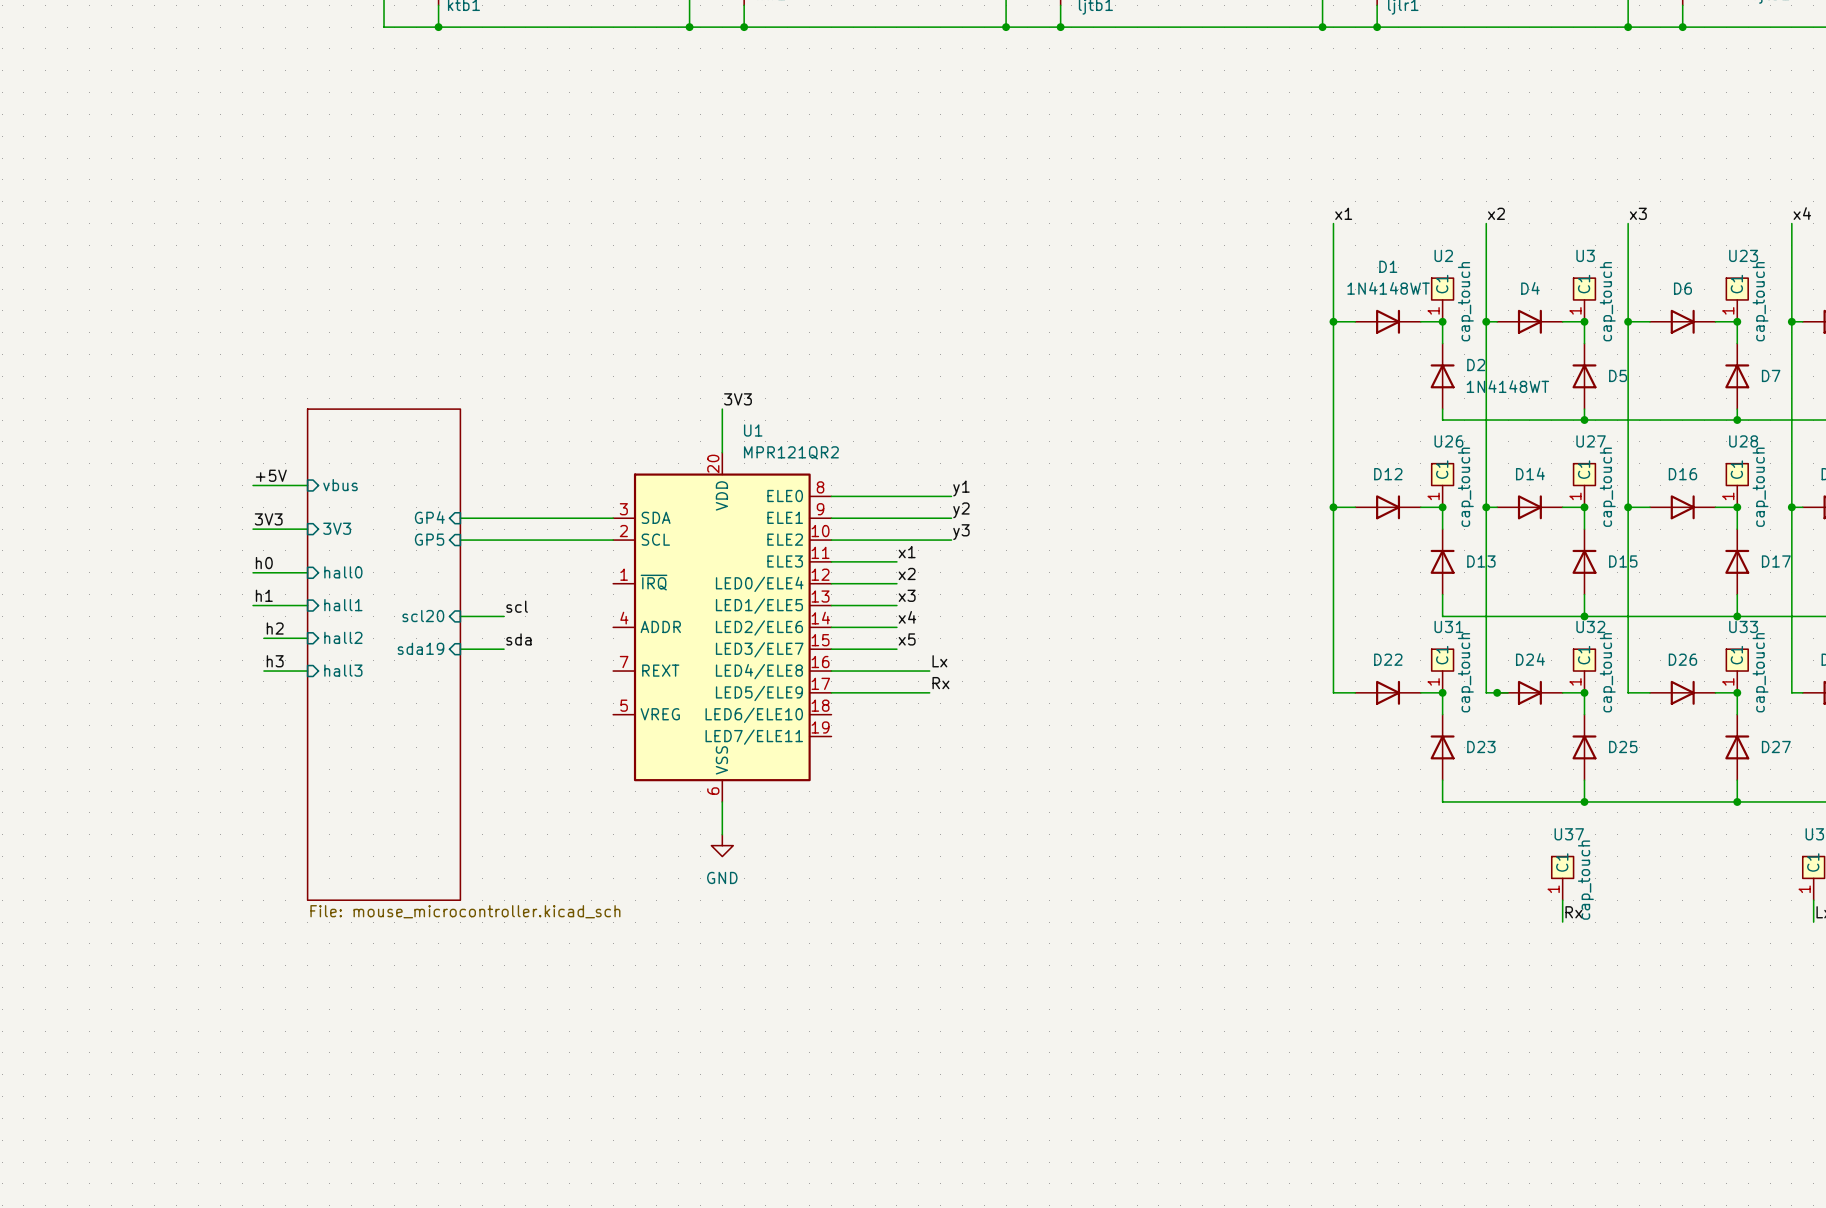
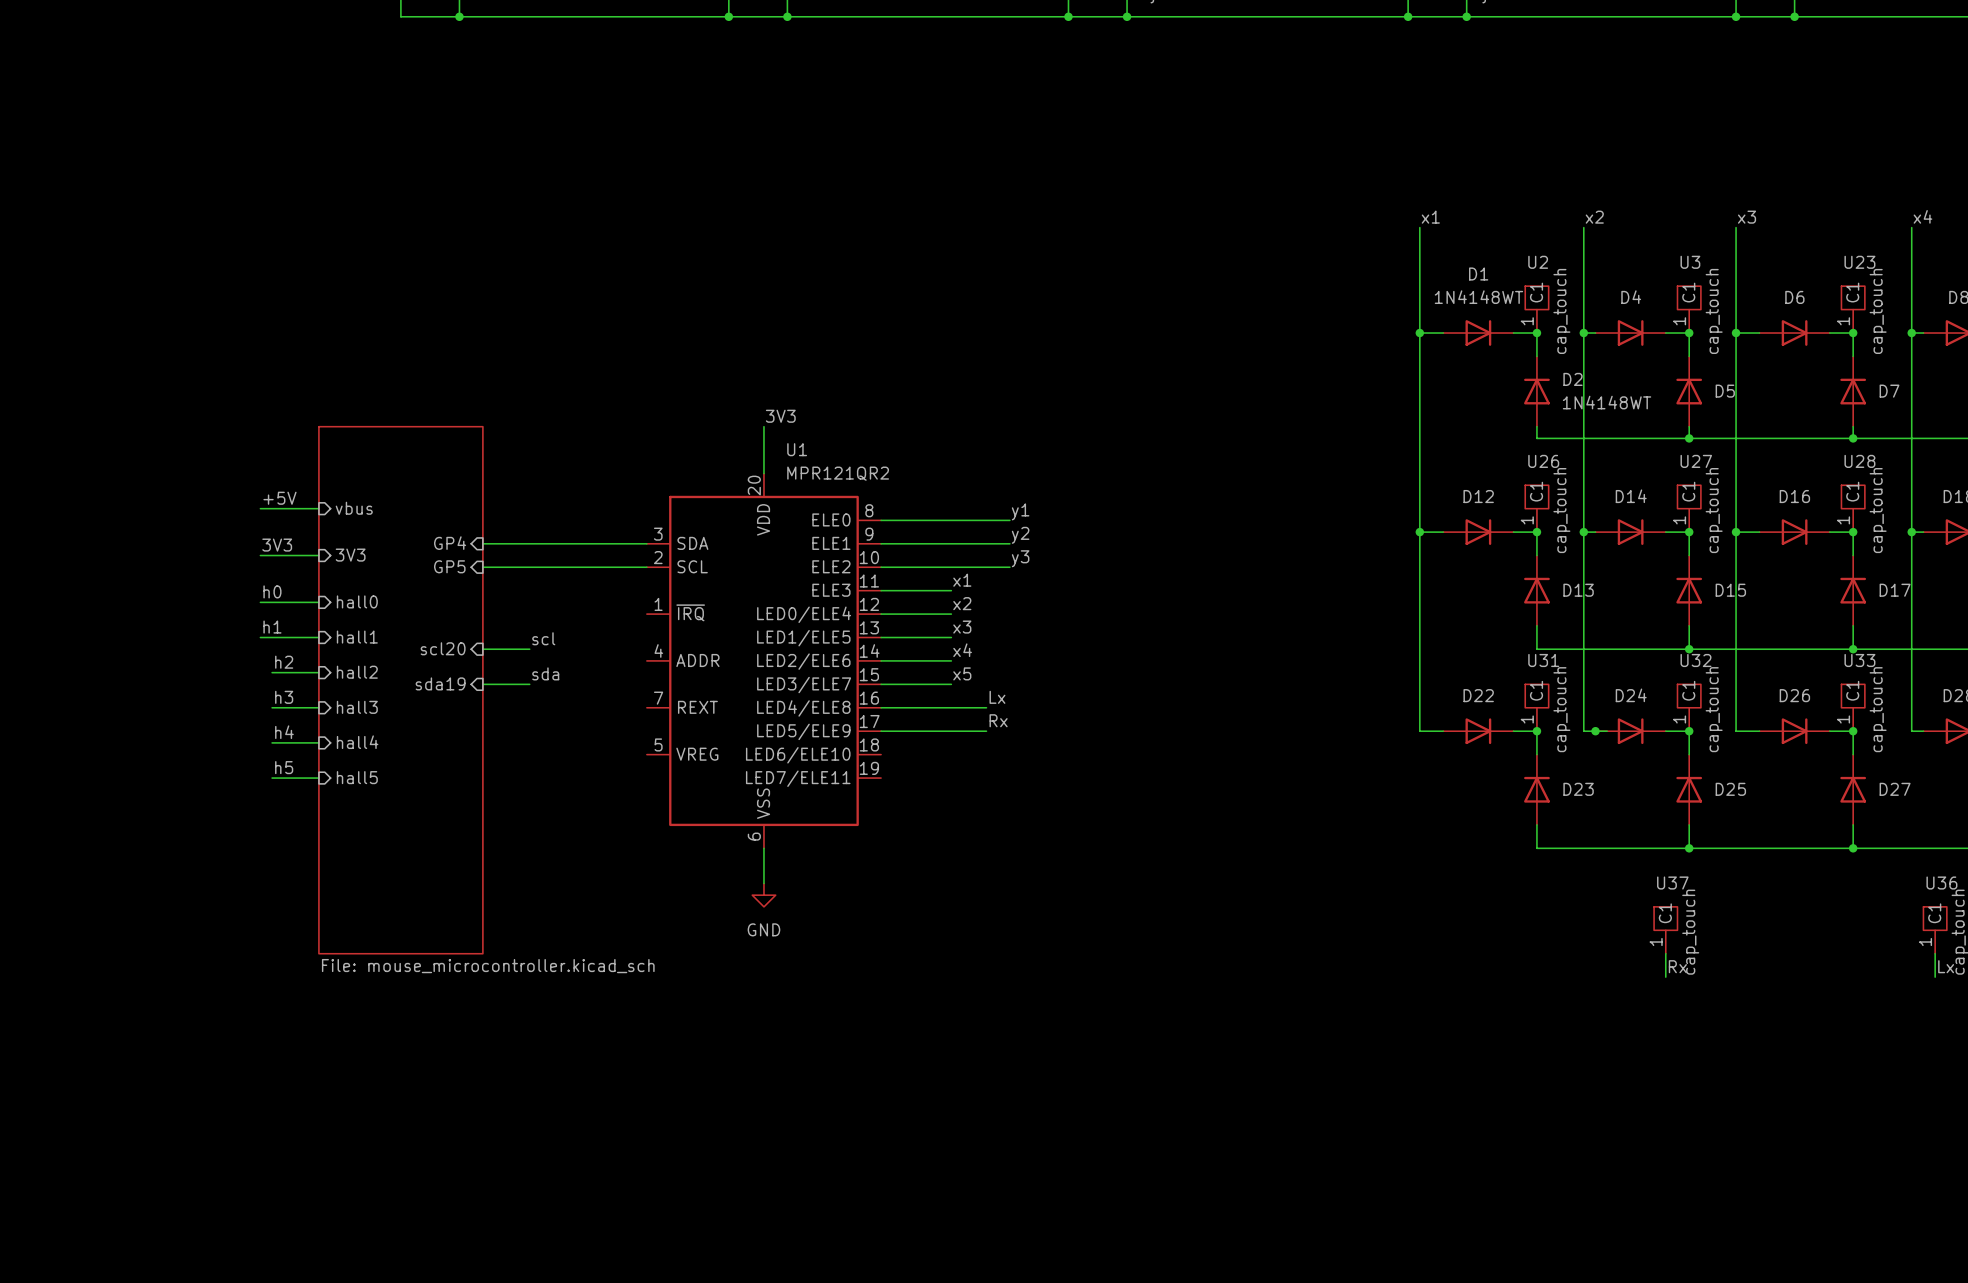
label: none -> h4 (284, 732)
wire: none -> (272, 742) (318, 742)
sheet pin: none -> hall4 (357, 742)
label: none -> h5 (284, 767)
wire: none -> (272, 778) (318, 778)
sheet pin: none -> hall5 (357, 777)

